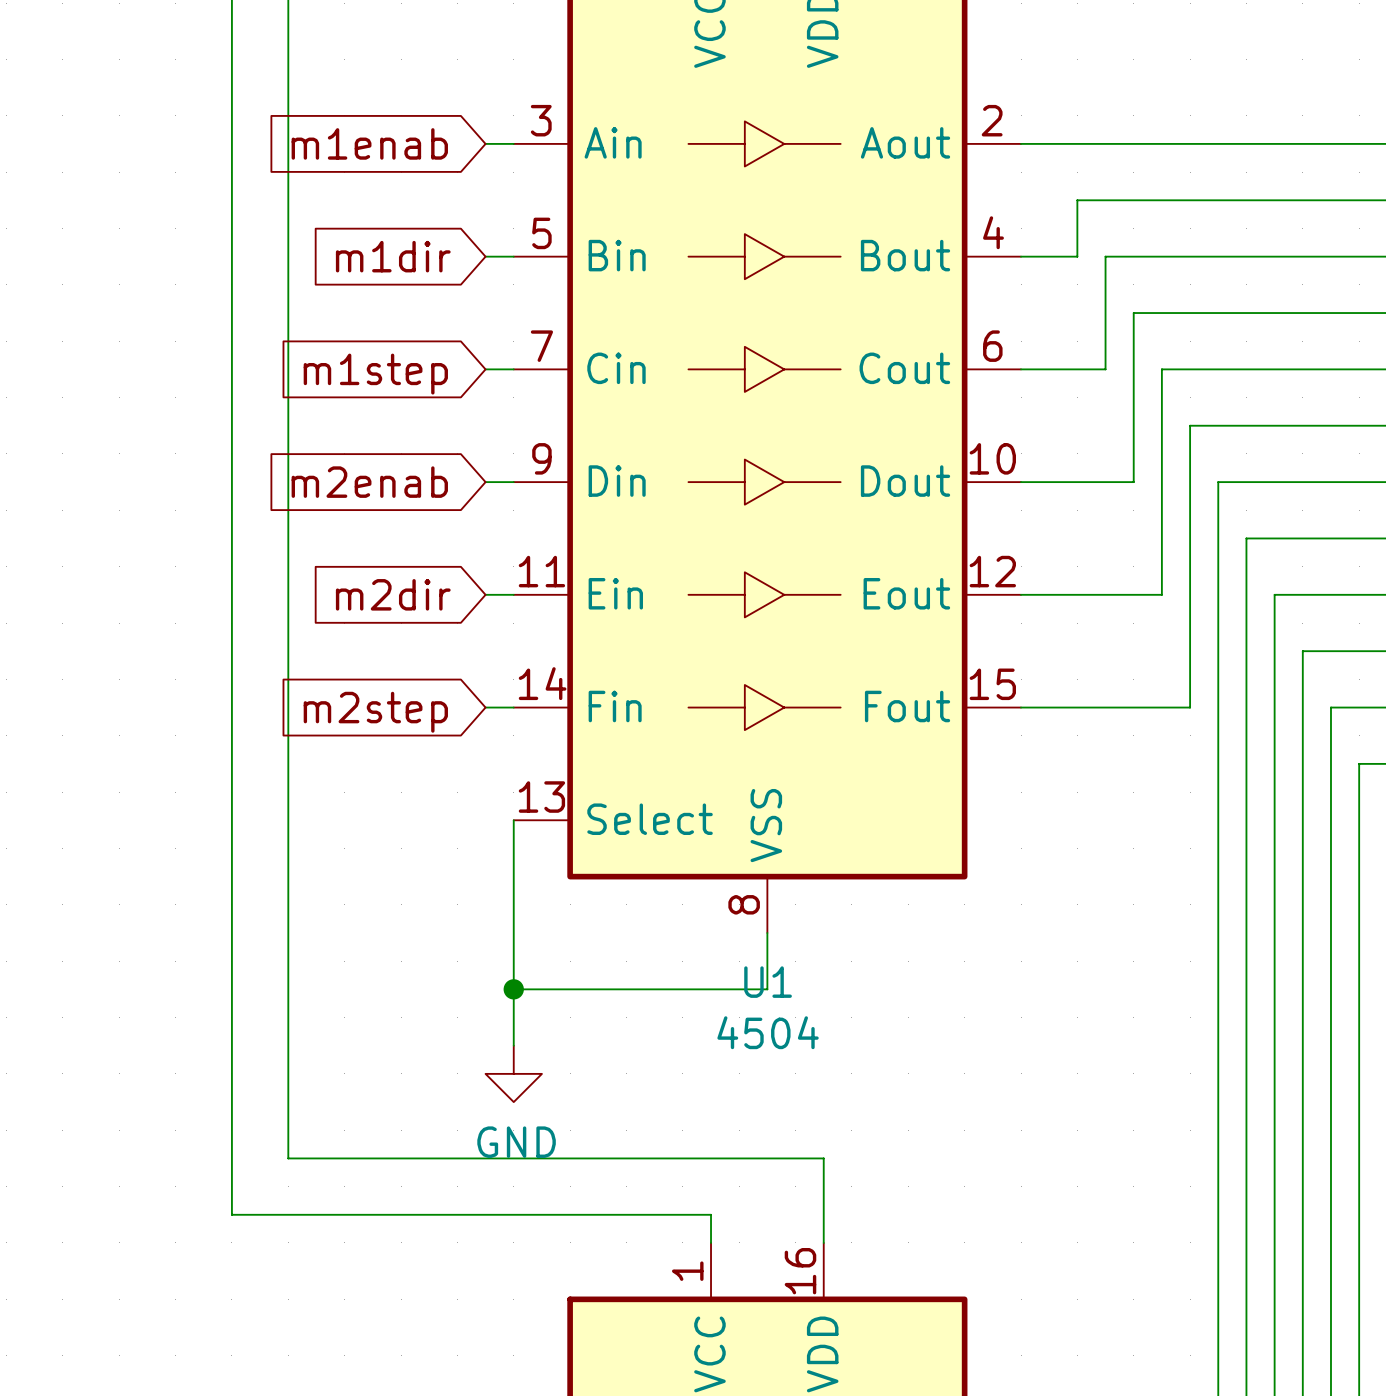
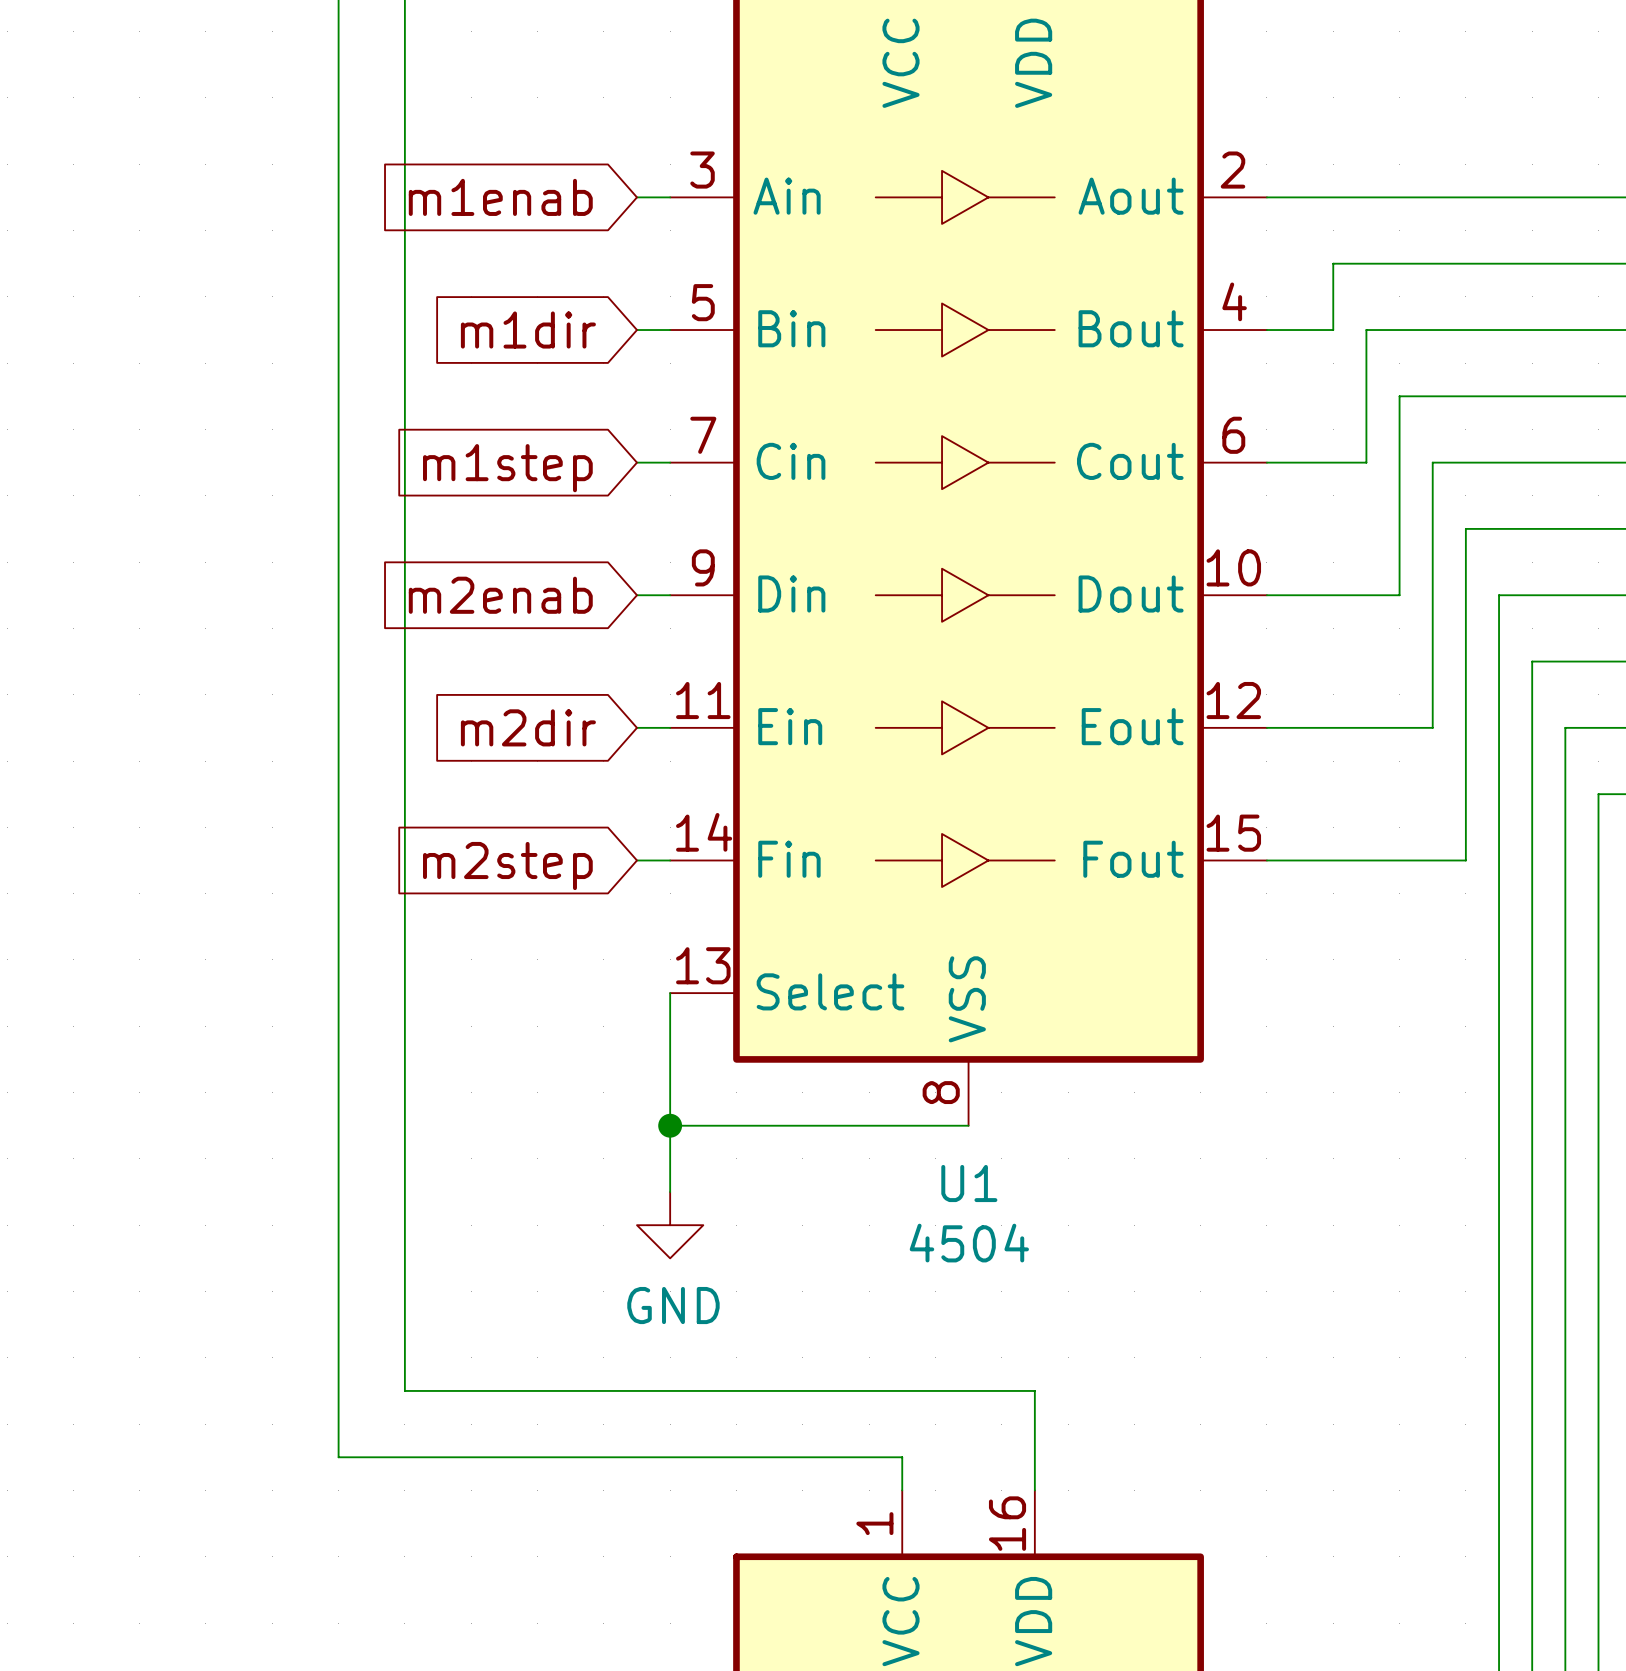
wire: (767, 932) (767, 989) (513, 989) (513, 1045) -> (968, 1125) (670, 1125)
junction position: (513, 989) -> (670, 1125)
power symbol position: GND (513, 1073) -> GND (670, 1225)

